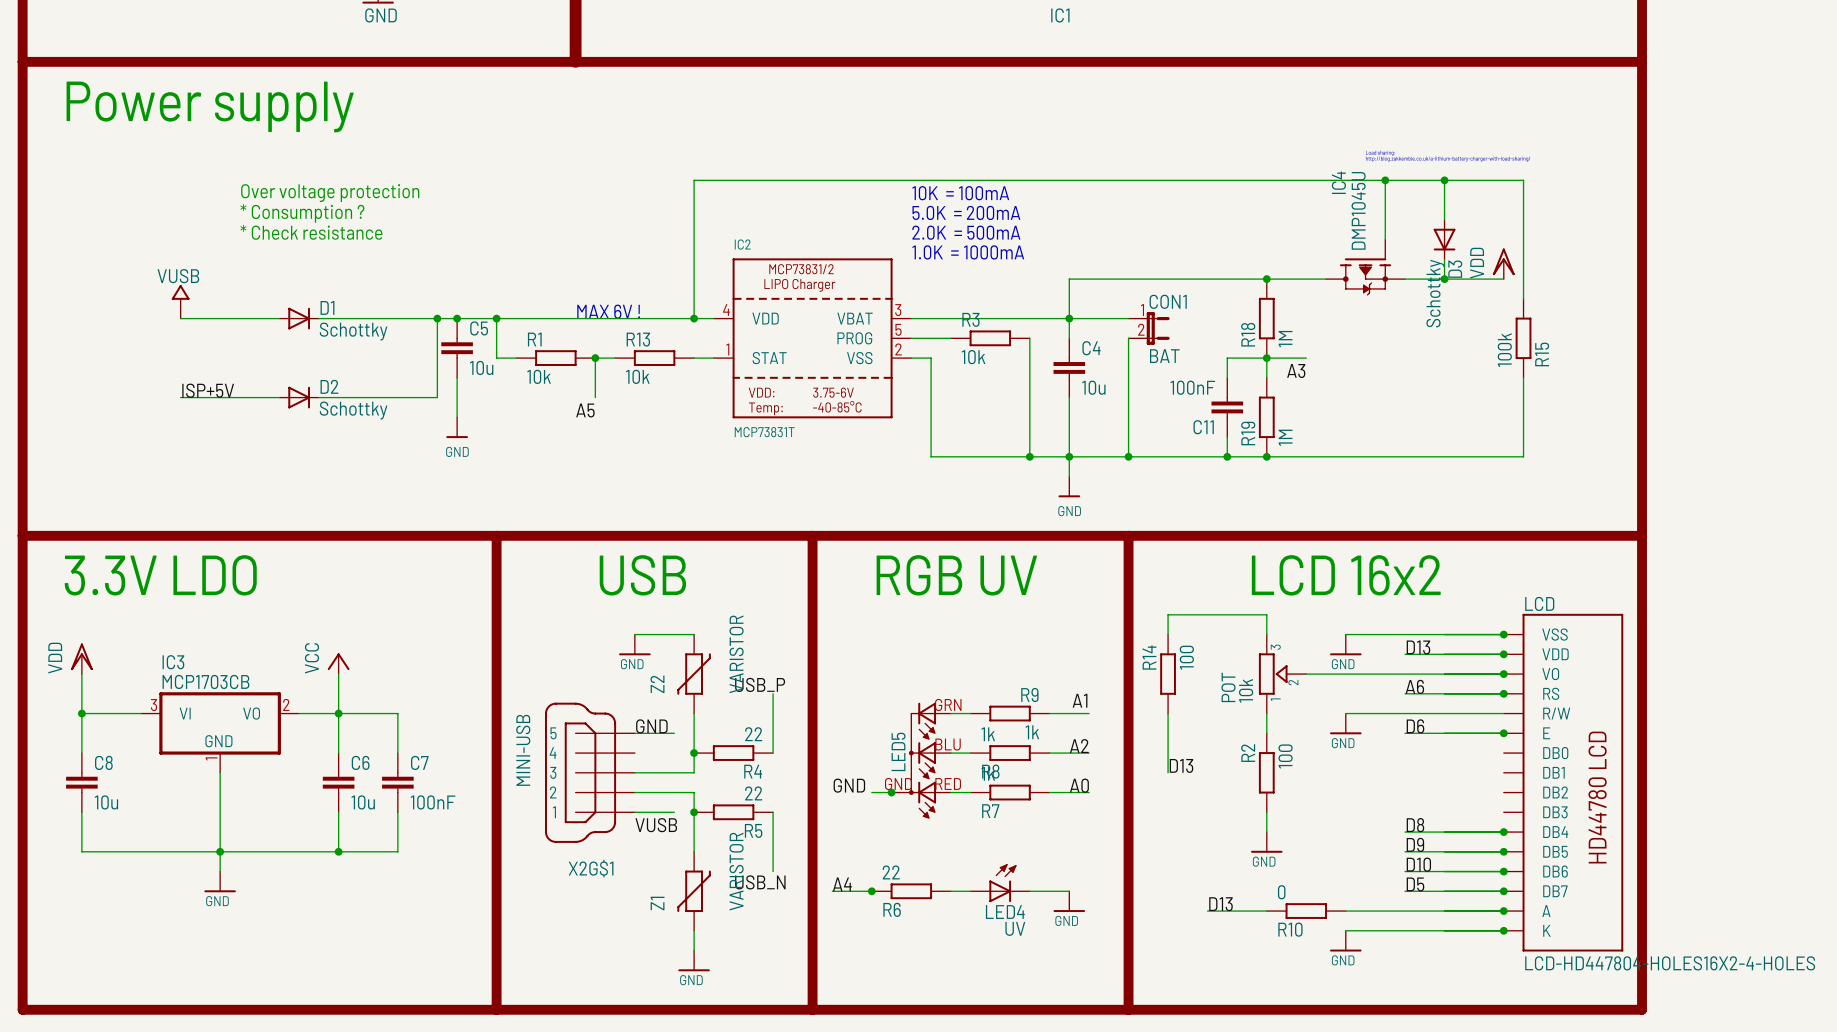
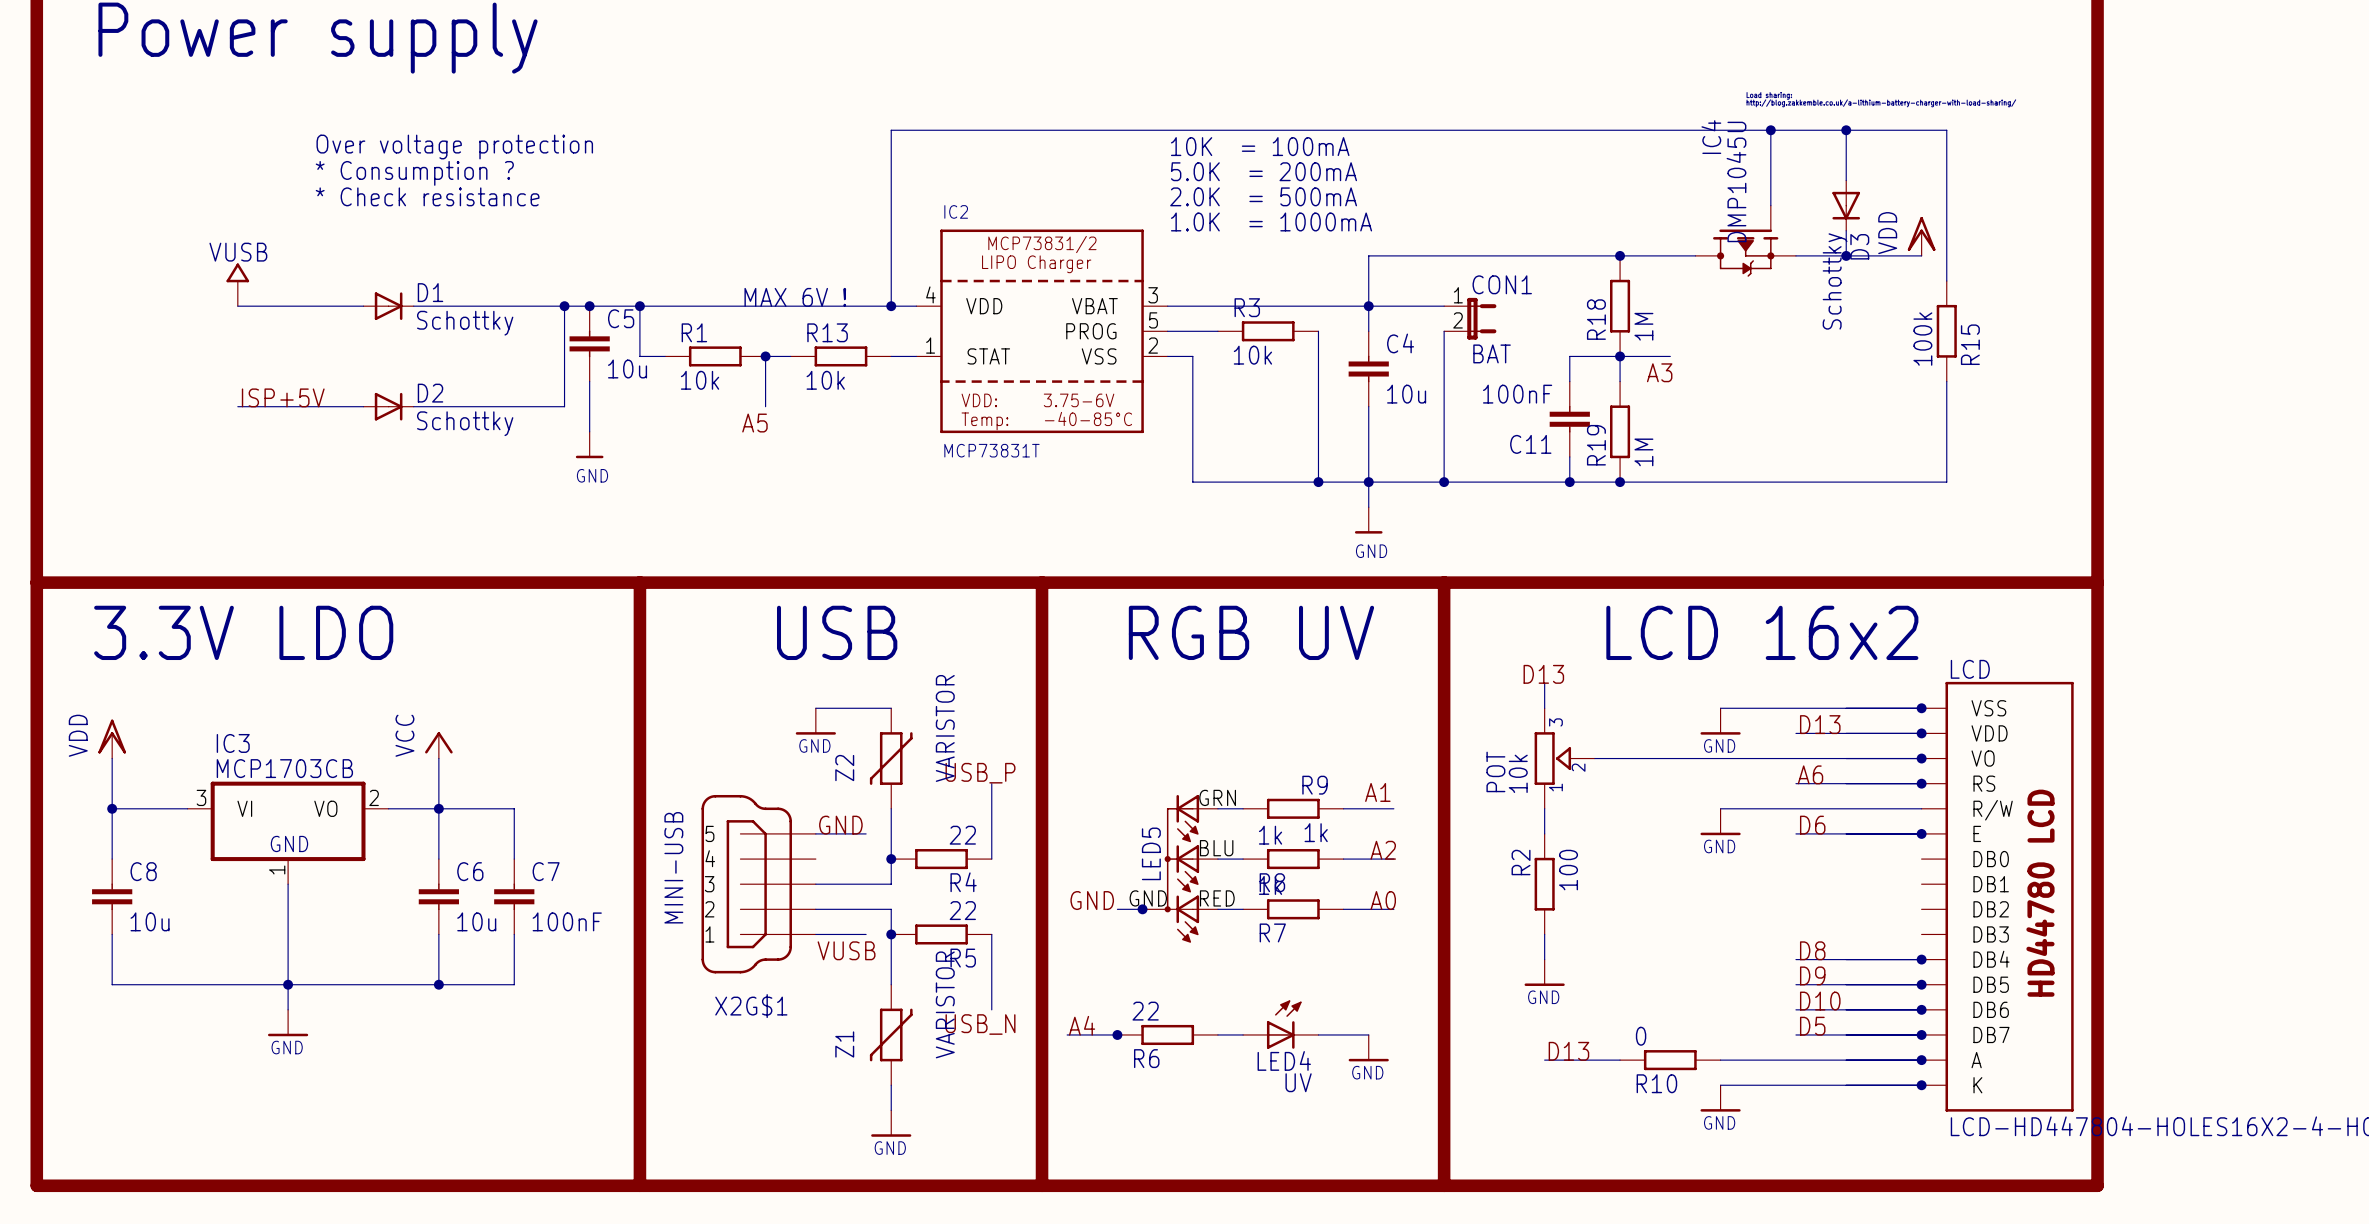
wire: none -> (1544, 683) (1544, 708)
wire: (1168, 634) (1168, 614) (1266, 614) (1266, 634) -> none
R14: 100 (1168, 674) -> none
wire: none -> (1594, 758) (1670, 758)
POT position: (1282, 674) -> (1564, 758)
wire: (1168, 713) (1168, 772) -> none
wire: (1266, 713) (1266, 733) -> (1544, 808) (1544, 833)
label position: D13 (1181, 765) -> D13 (1543, 674)
R2 position: (1266, 772) -> (1544, 884)
wire: (1266, 812) (1266, 832) -> (1544, 934) (1544, 959)
power symbol position: GND (1266, 842) -> GND (1544, 972)

